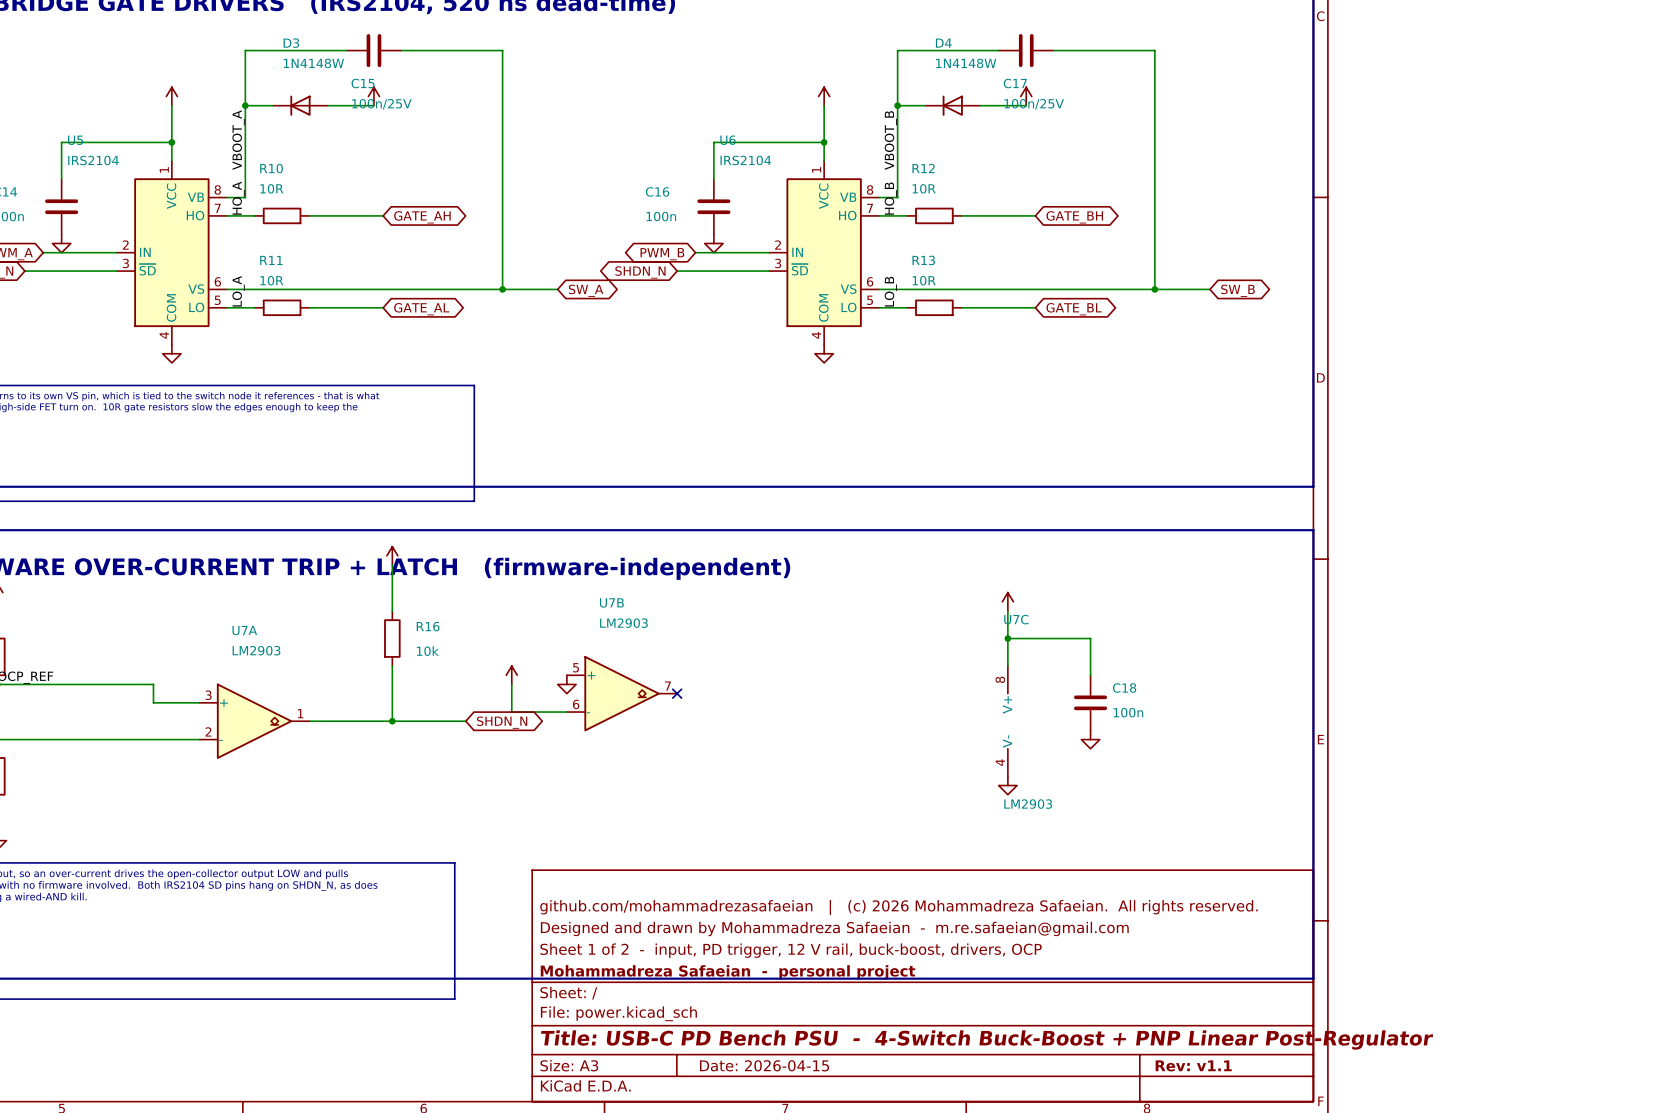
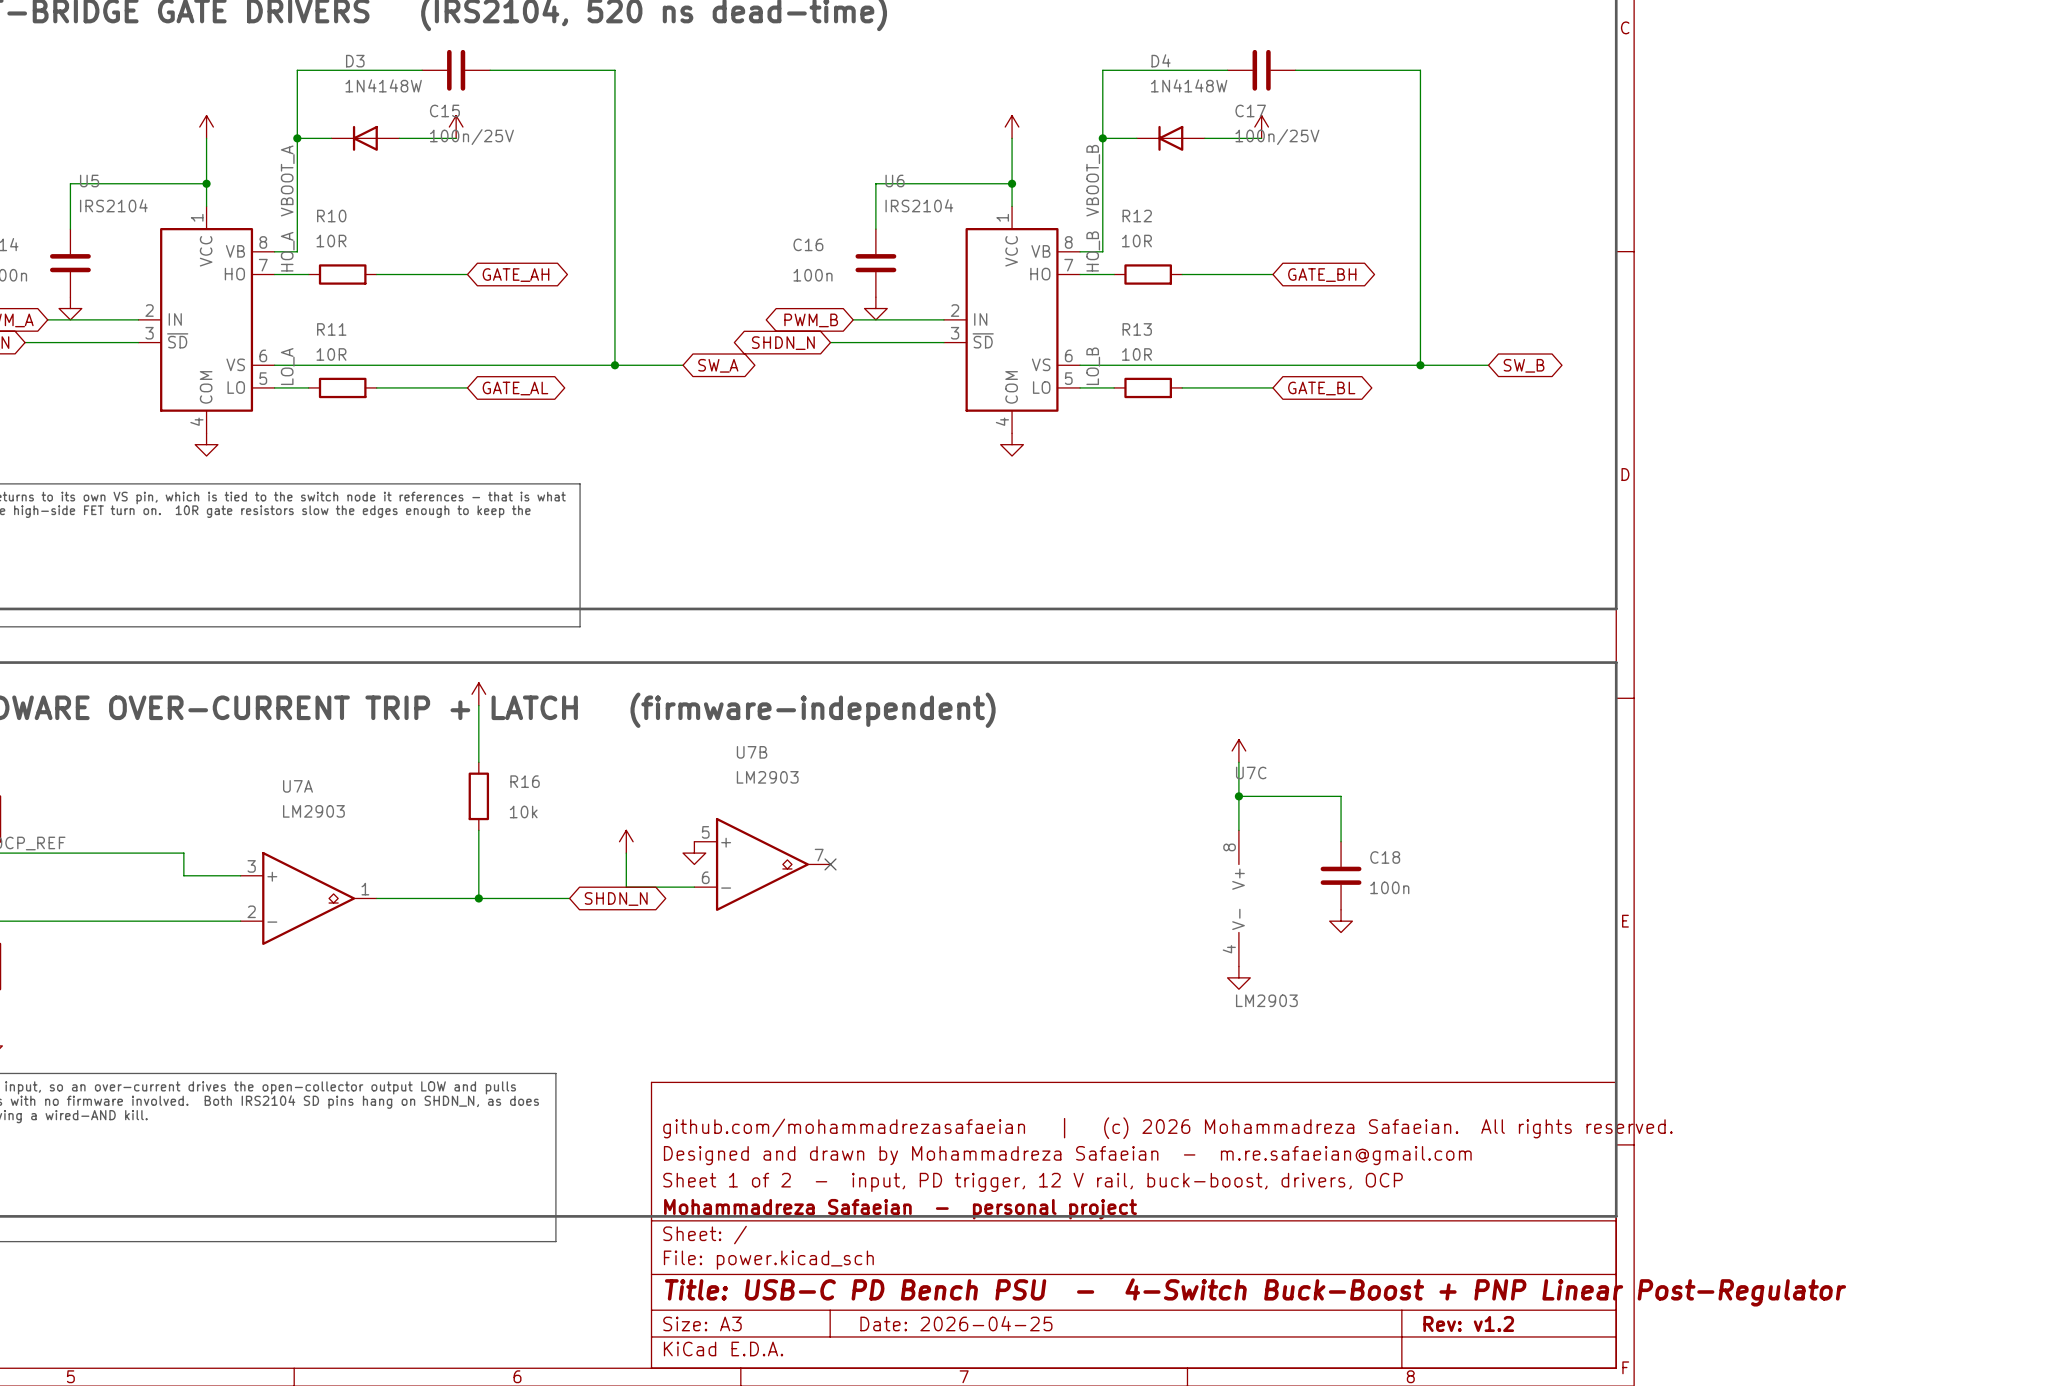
title block: Date: 2026-04-15 (764, 1065) -> Date: 2026-04-25 (956, 1323)
title block: Rev: v1.1 (1193, 1065) -> Rev: v1.2 (1468, 1323)

